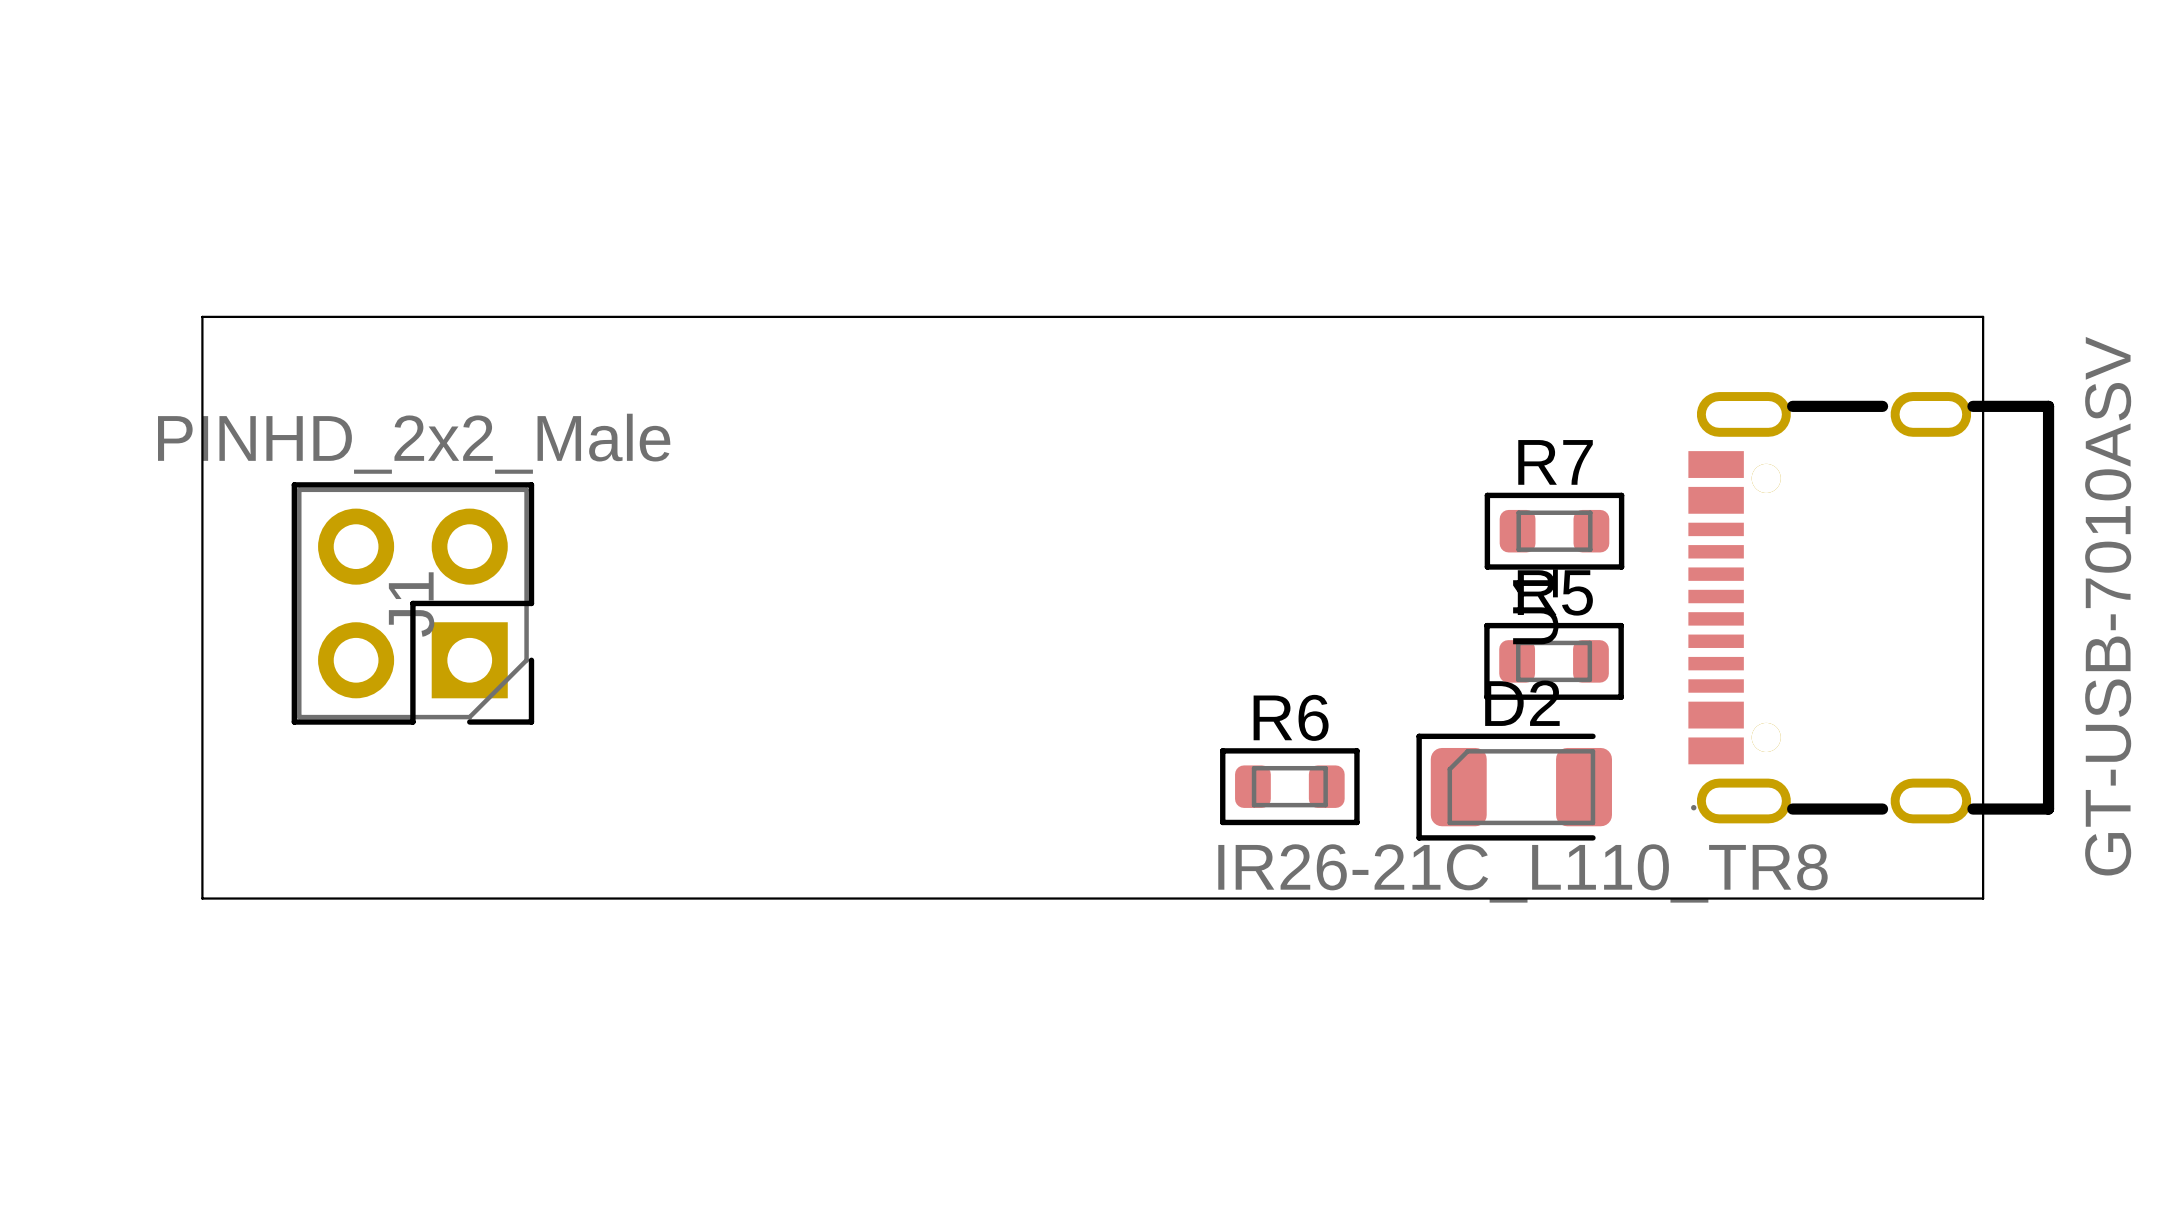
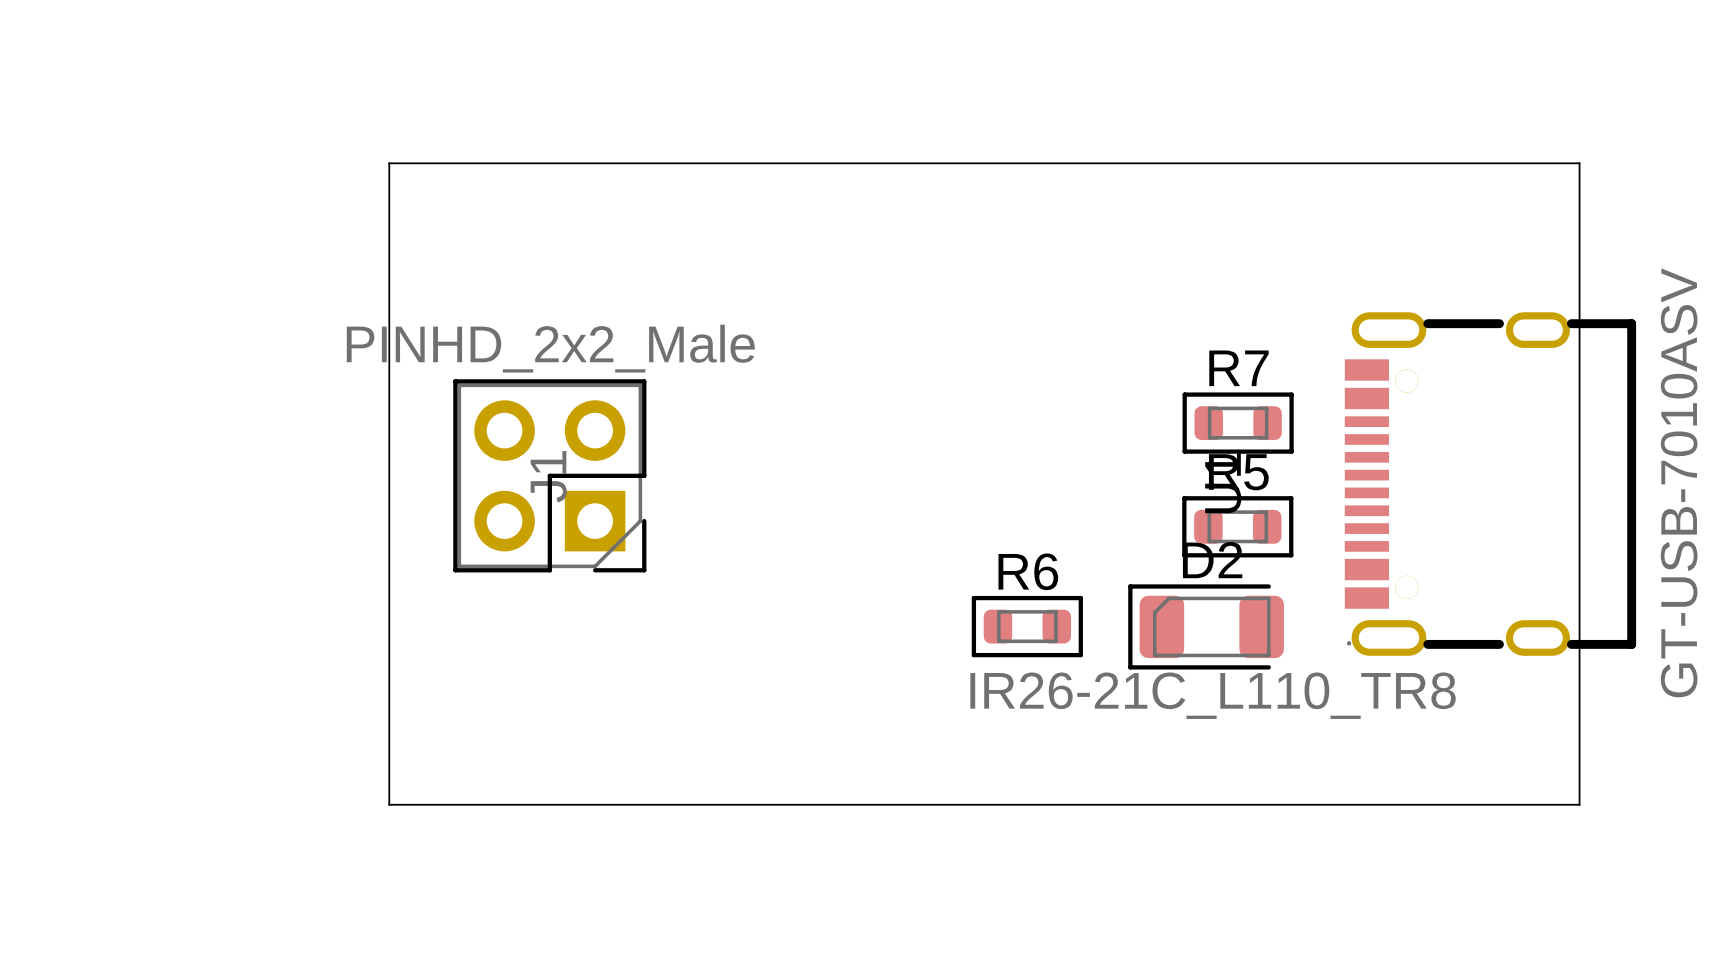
board edge: (1983, 316) (202, 316) (202, 898) (1983, 898) -> (1579, 252) (1579, 163) (389, 163) (389, 804) (1579, 804) (1579, 715)
J1 position: (412, 603) -> (549, 475)

